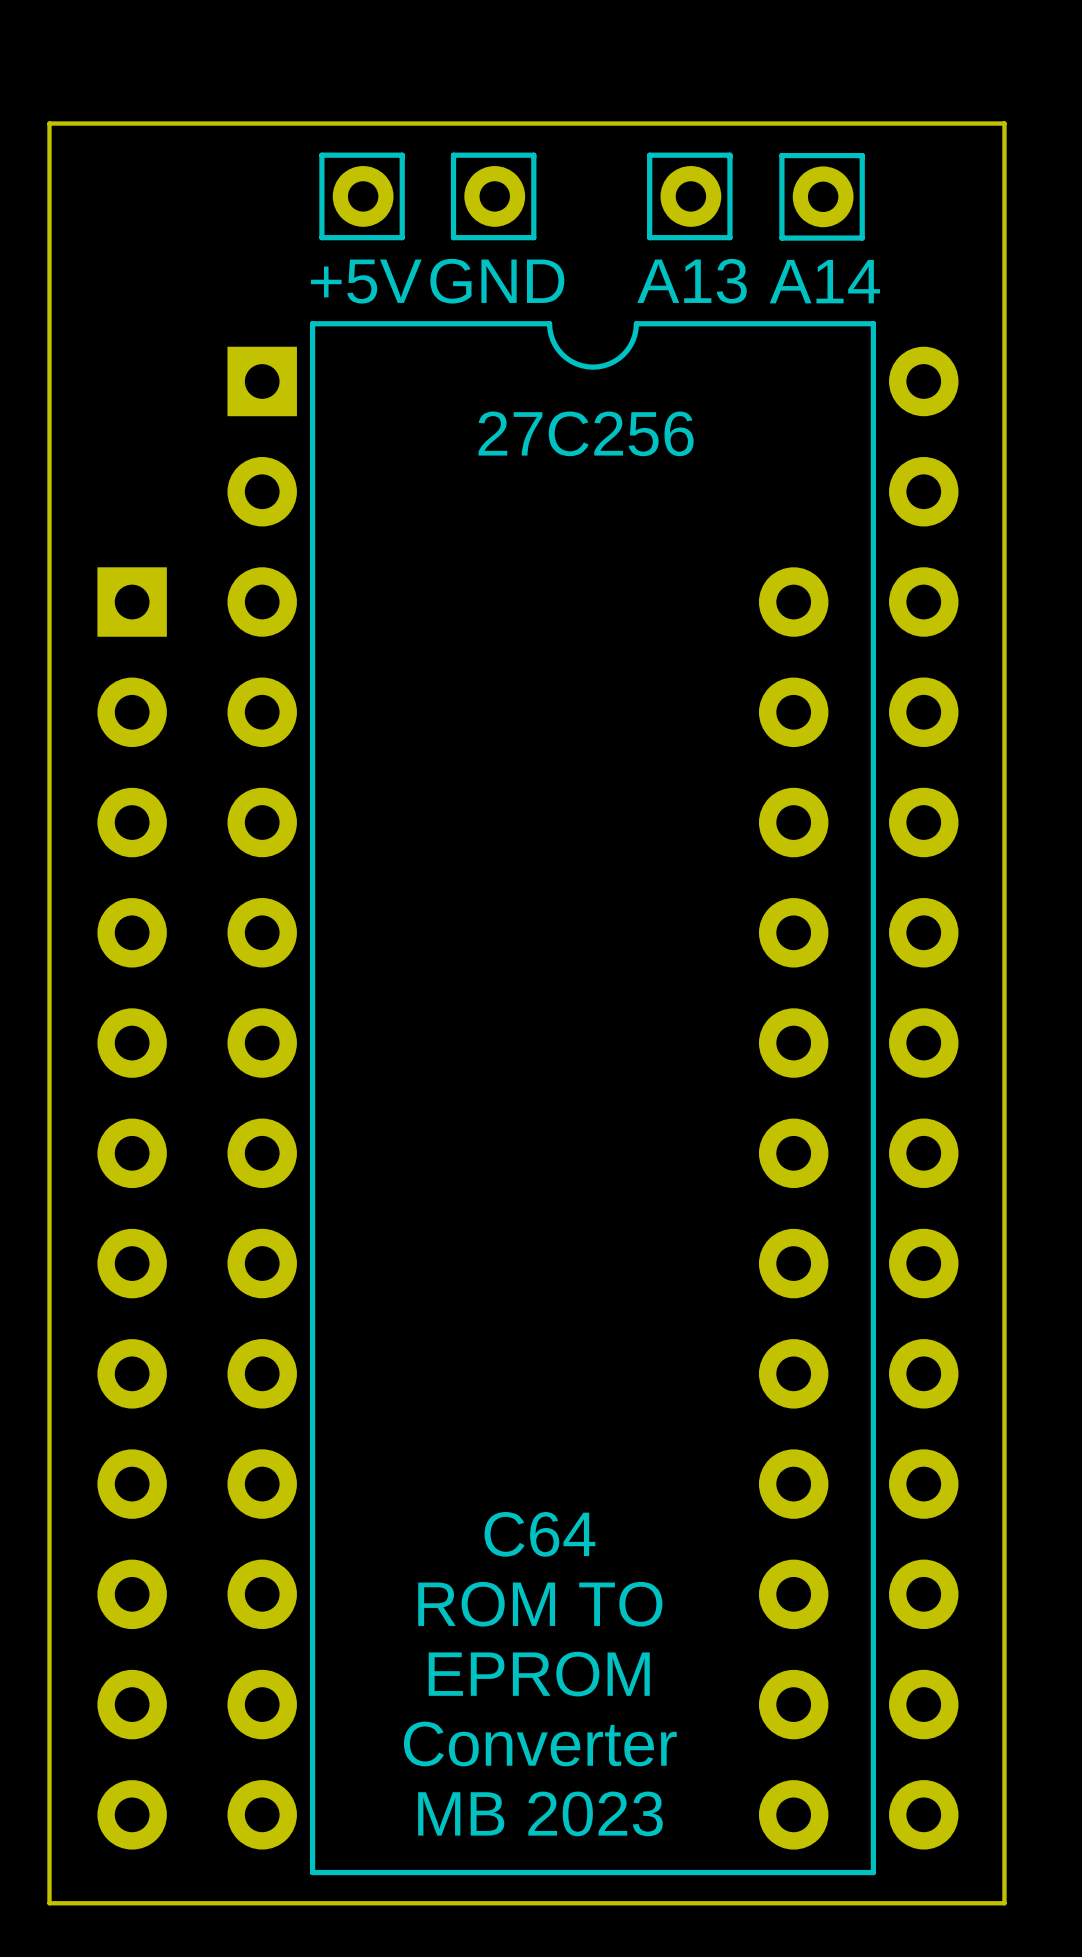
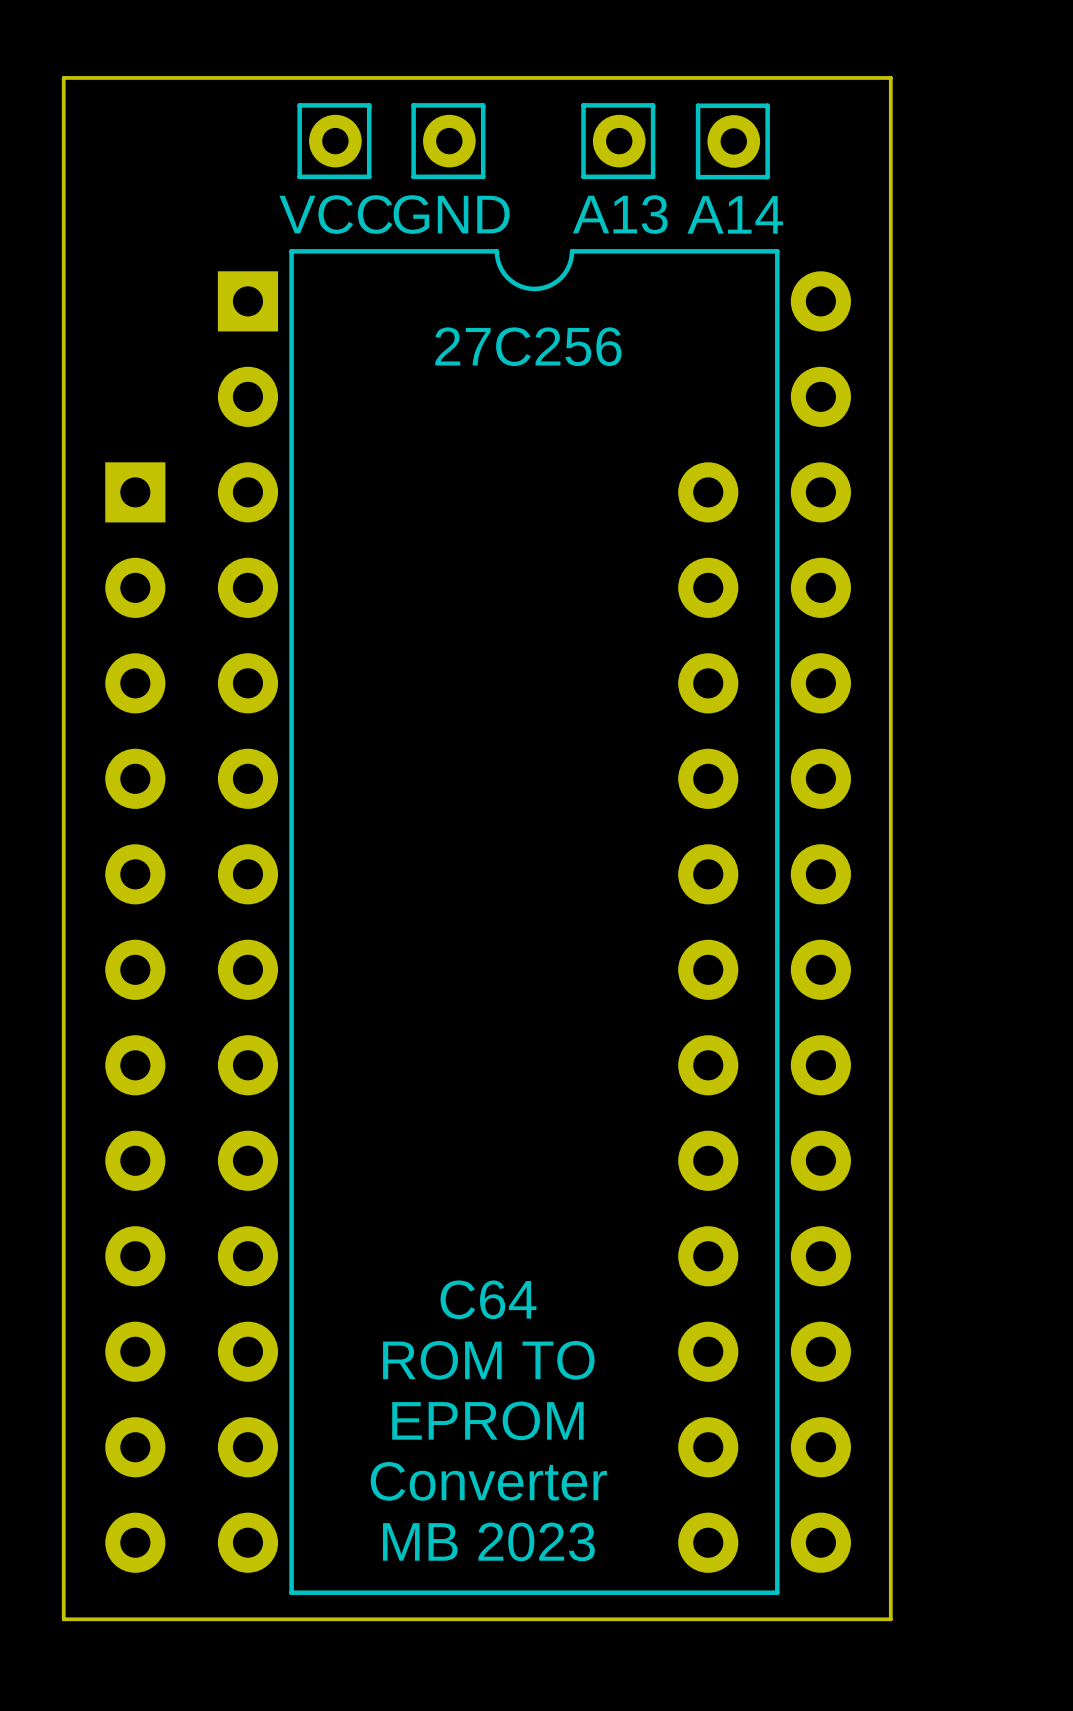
part value: +5V (366, 281) -> VCC (335, 214)

